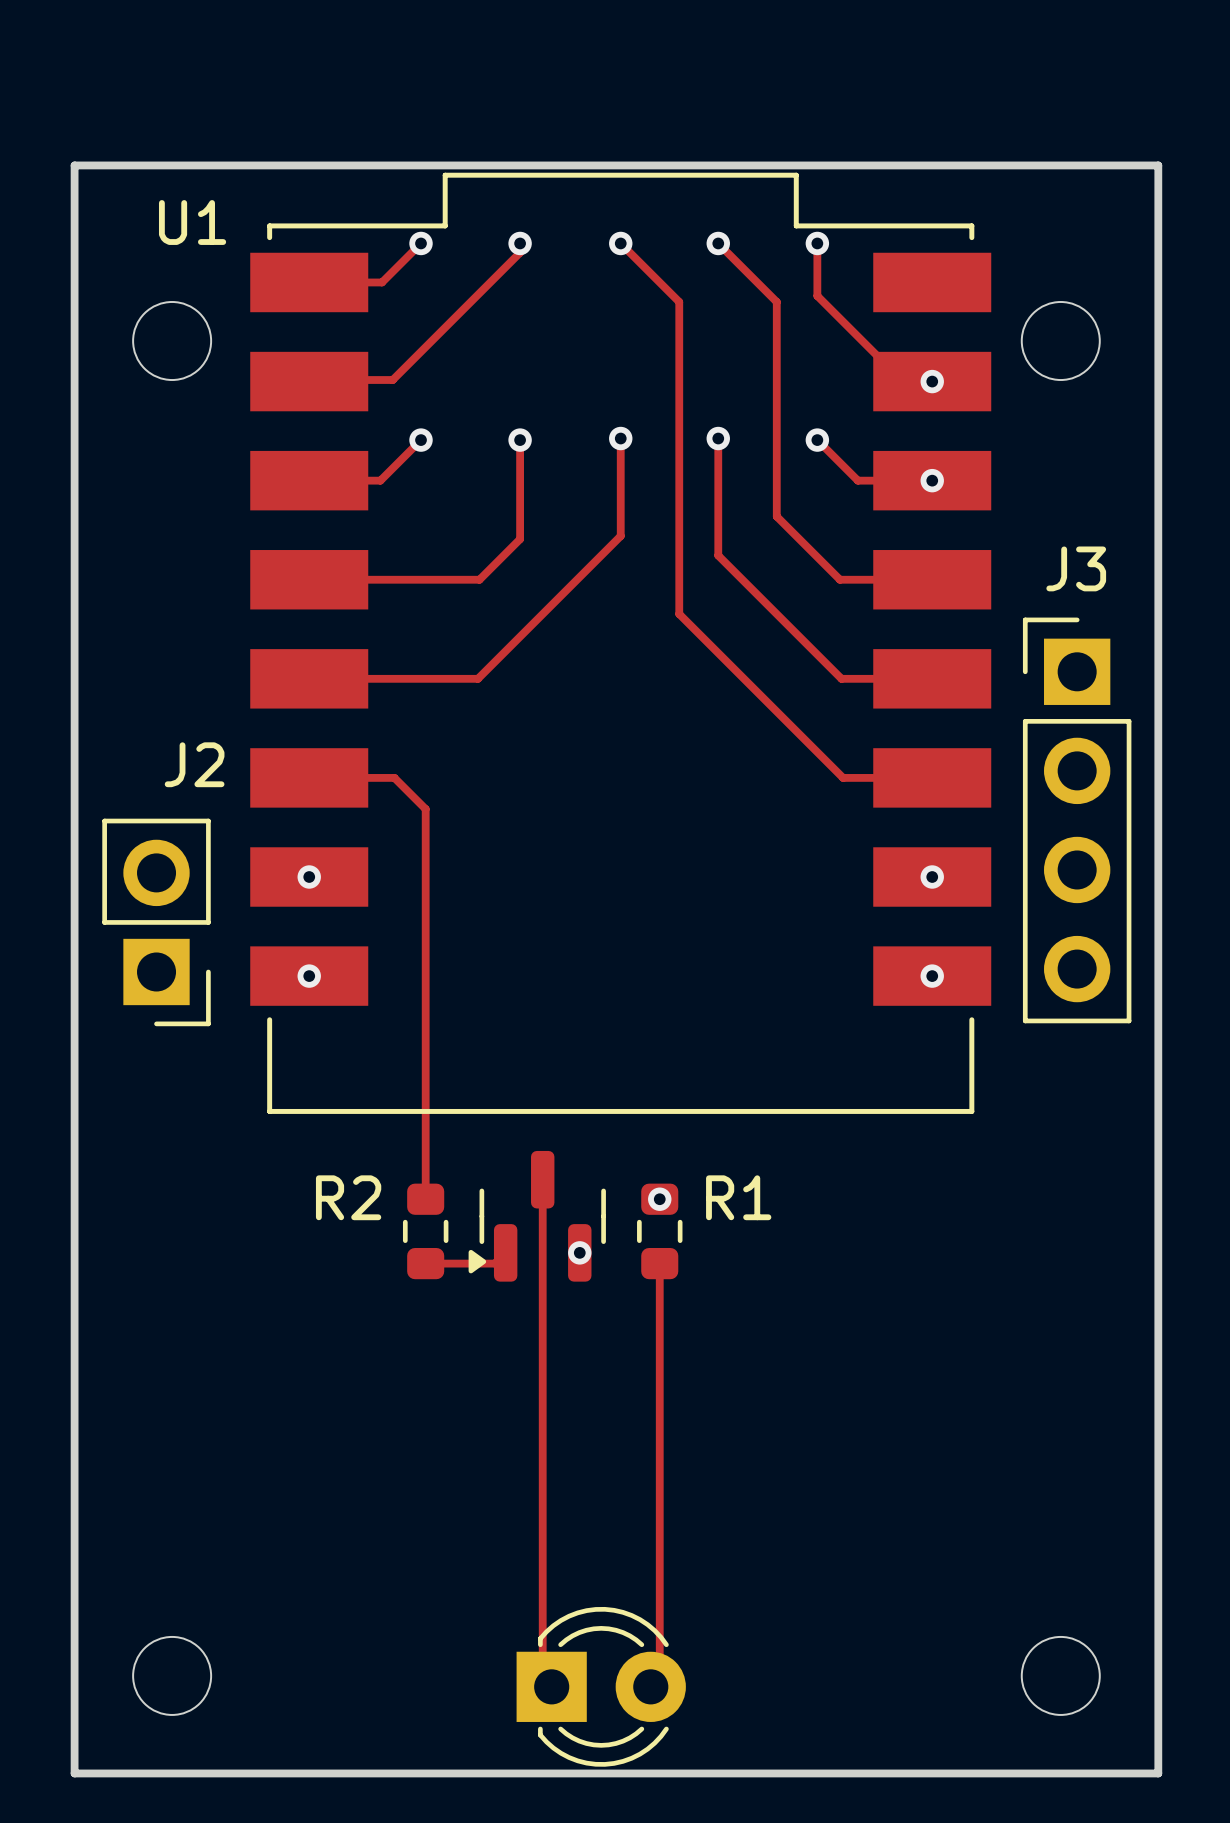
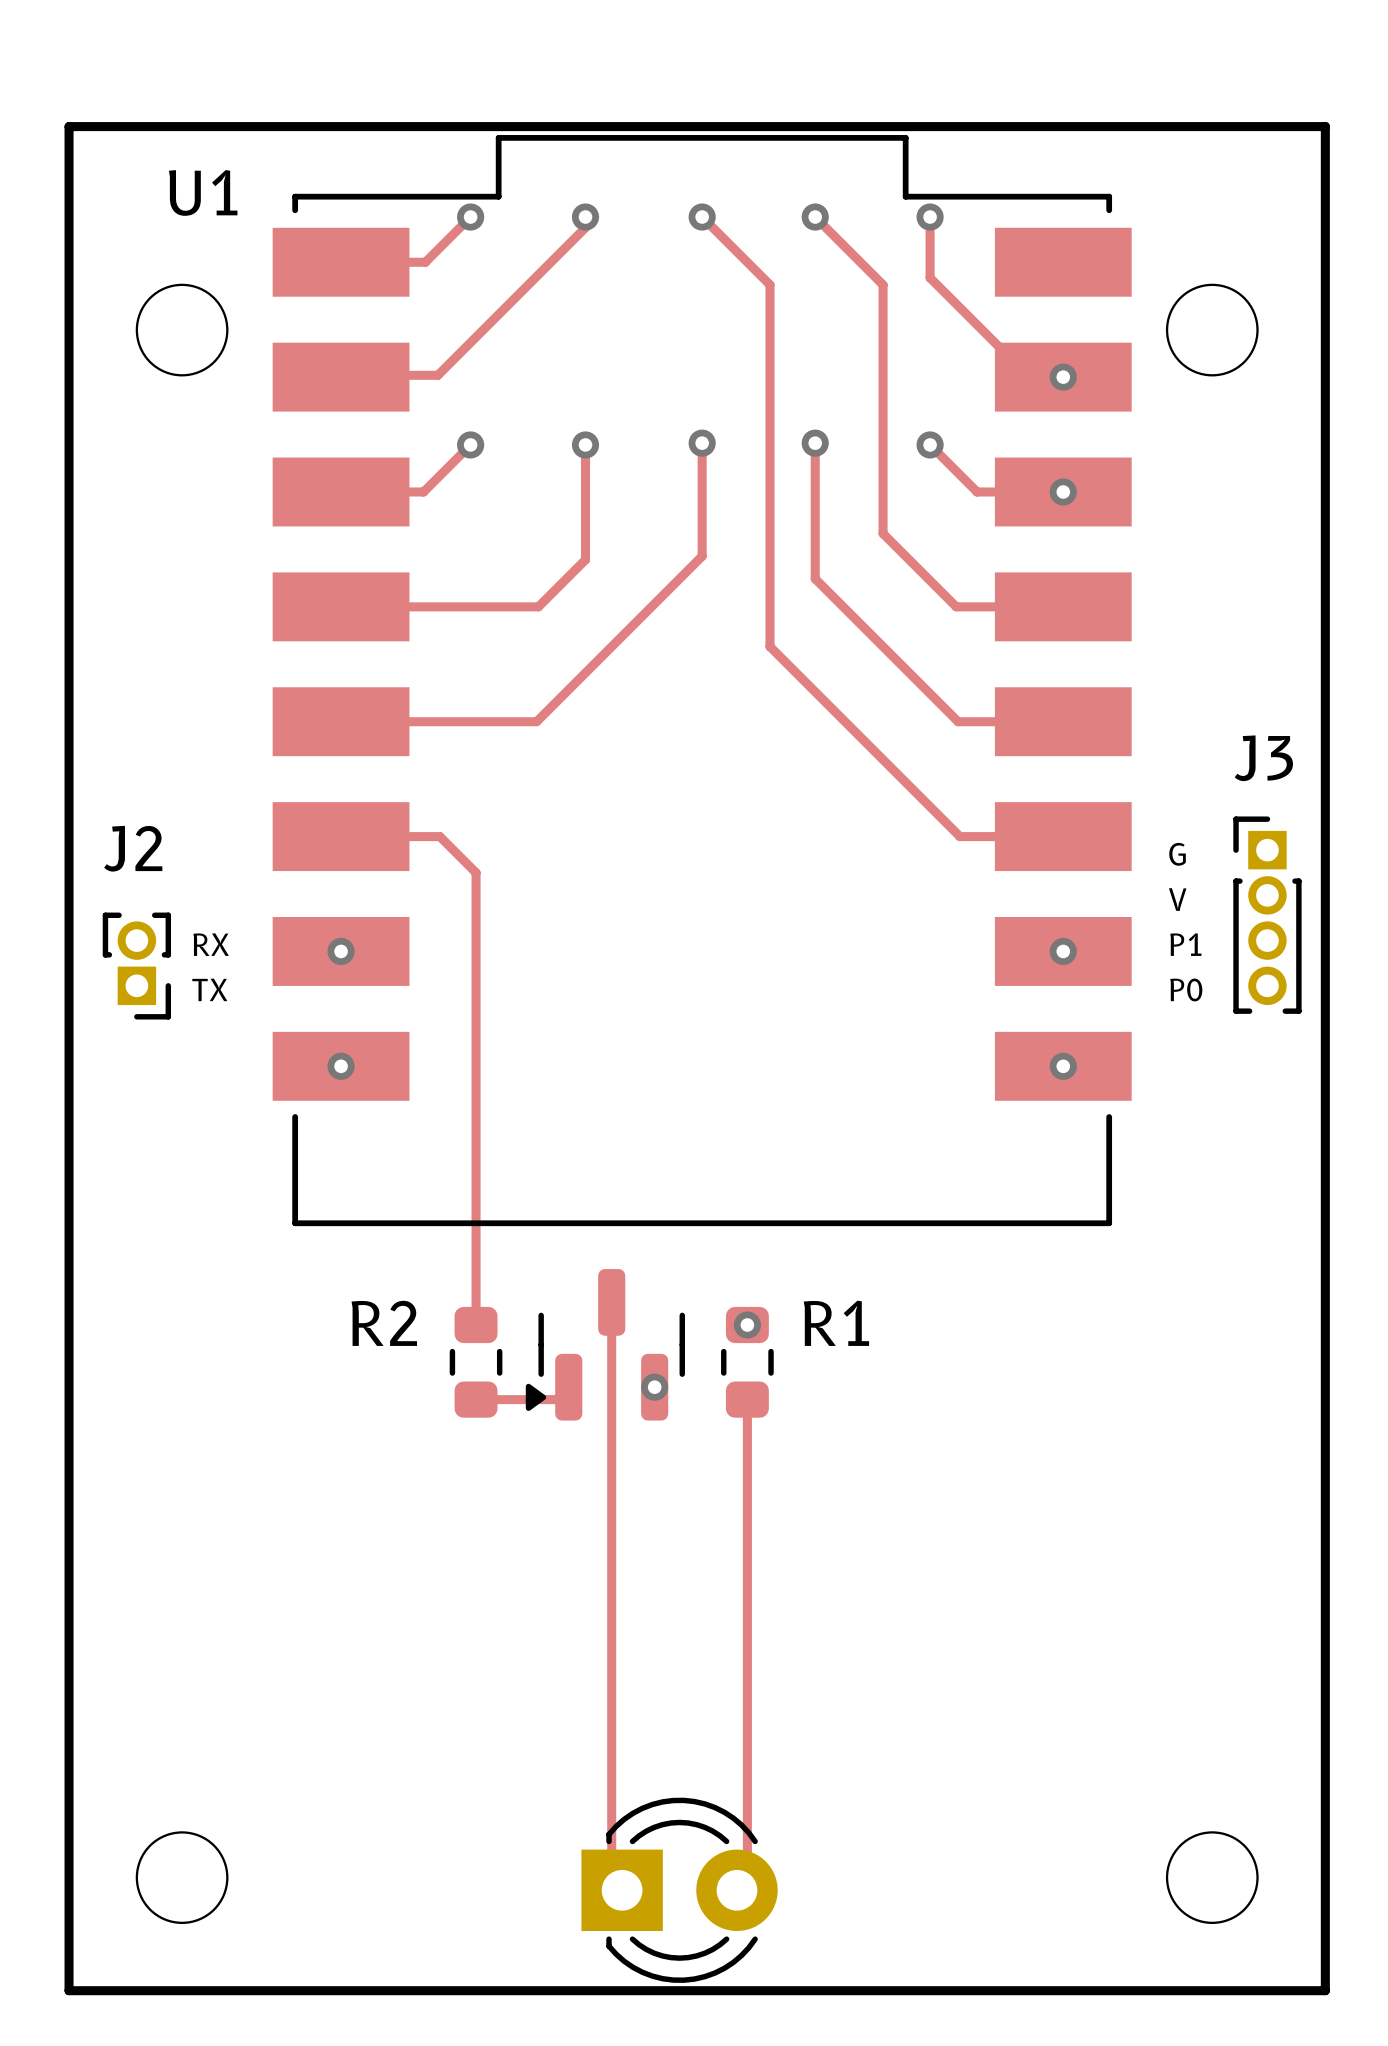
J3 name position: J3 (1076, 568) -> J3 (1263, 758)
J3 footprint: [1022, 617, 1132, 1024] -> [1233, 816, 1302, 1014]
text: none -> G (1177, 854)
J2 footprint: [102, 818, 211, 1027] -> [102, 912, 172, 1020]
text: none -> V (1177, 899)
text: none -> RX (211, 944)
text: none -> P1 (1185, 944)
text: none -> TX (209, 989)
text: none -> P0 (1186, 989)

